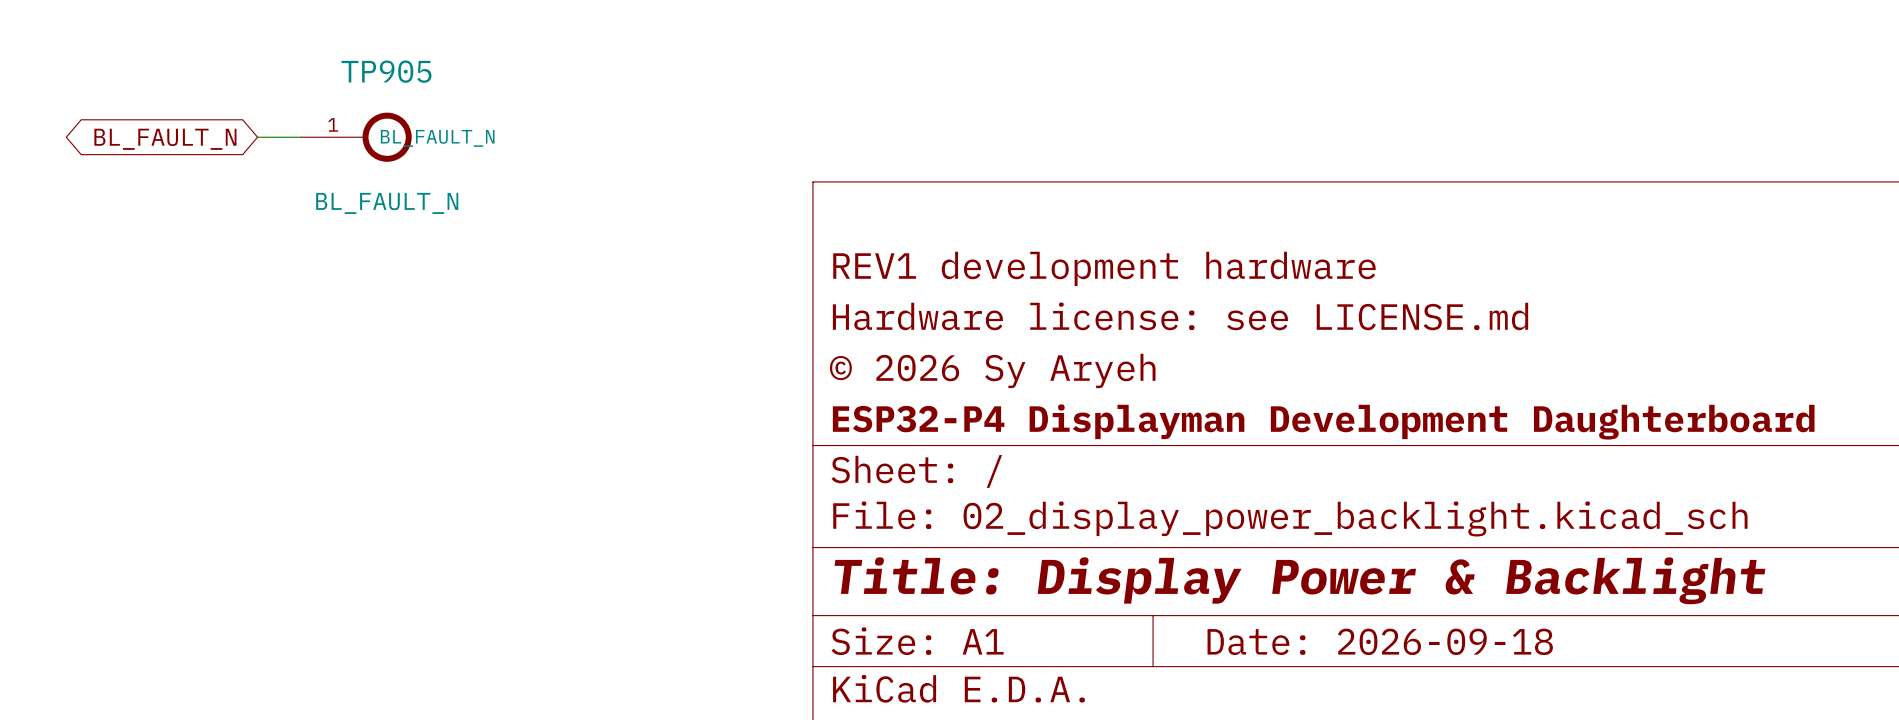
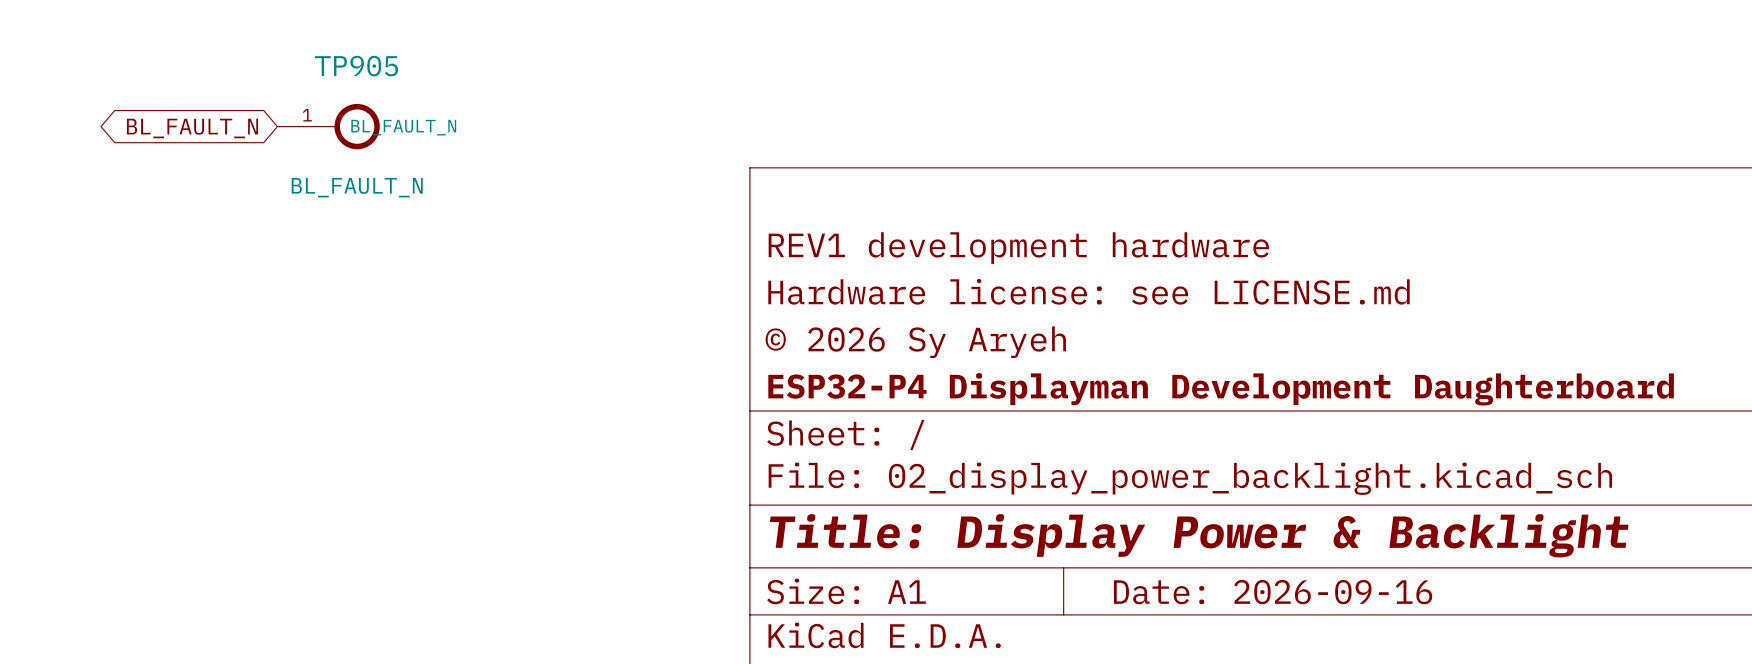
wire: (257, 137) (300, 137) -> none
global label position: BL_FAULT_N (165, 139) -> BL_FAULT_N (192, 128)
title block: Date: 2026-09-18 (1380, 641) -> Date: 2026-09-16 (1273, 592)

